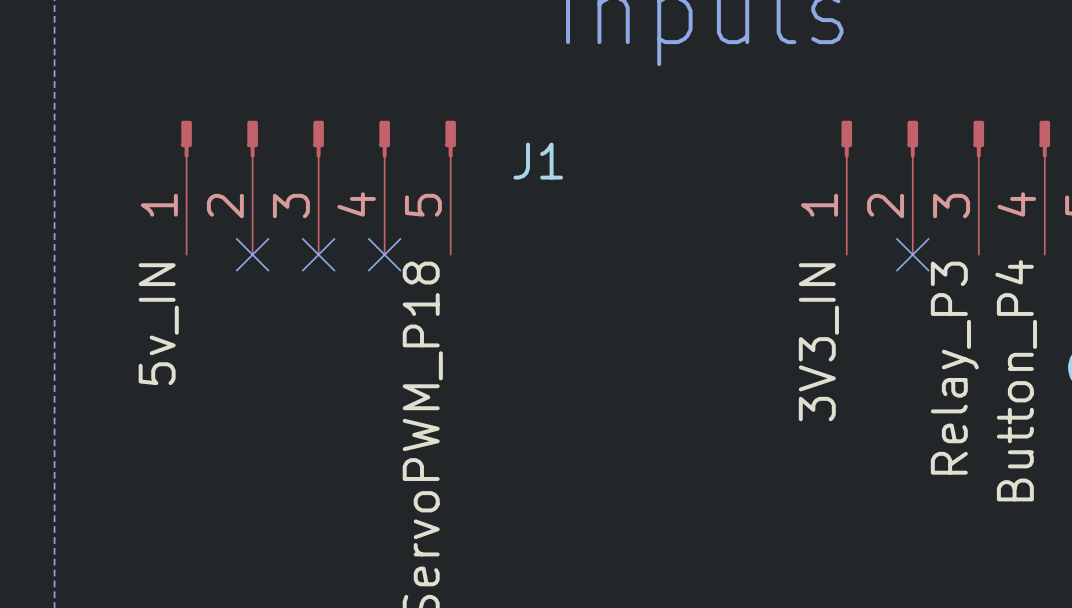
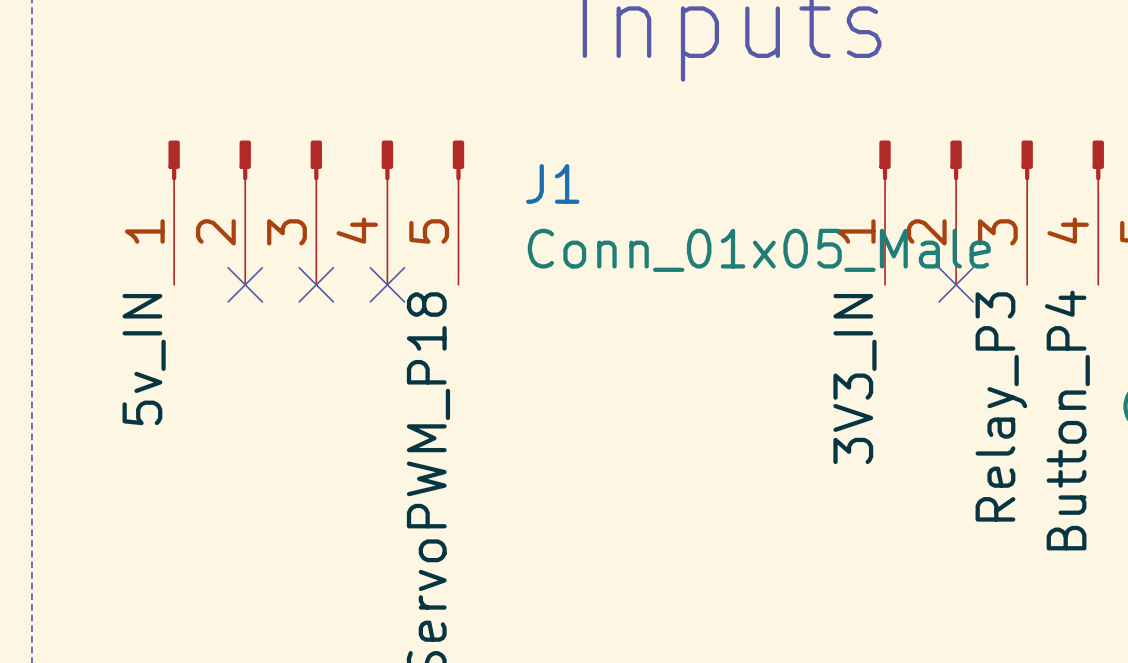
J1 value: none -> Conn_01x05_Male (759, 250)

